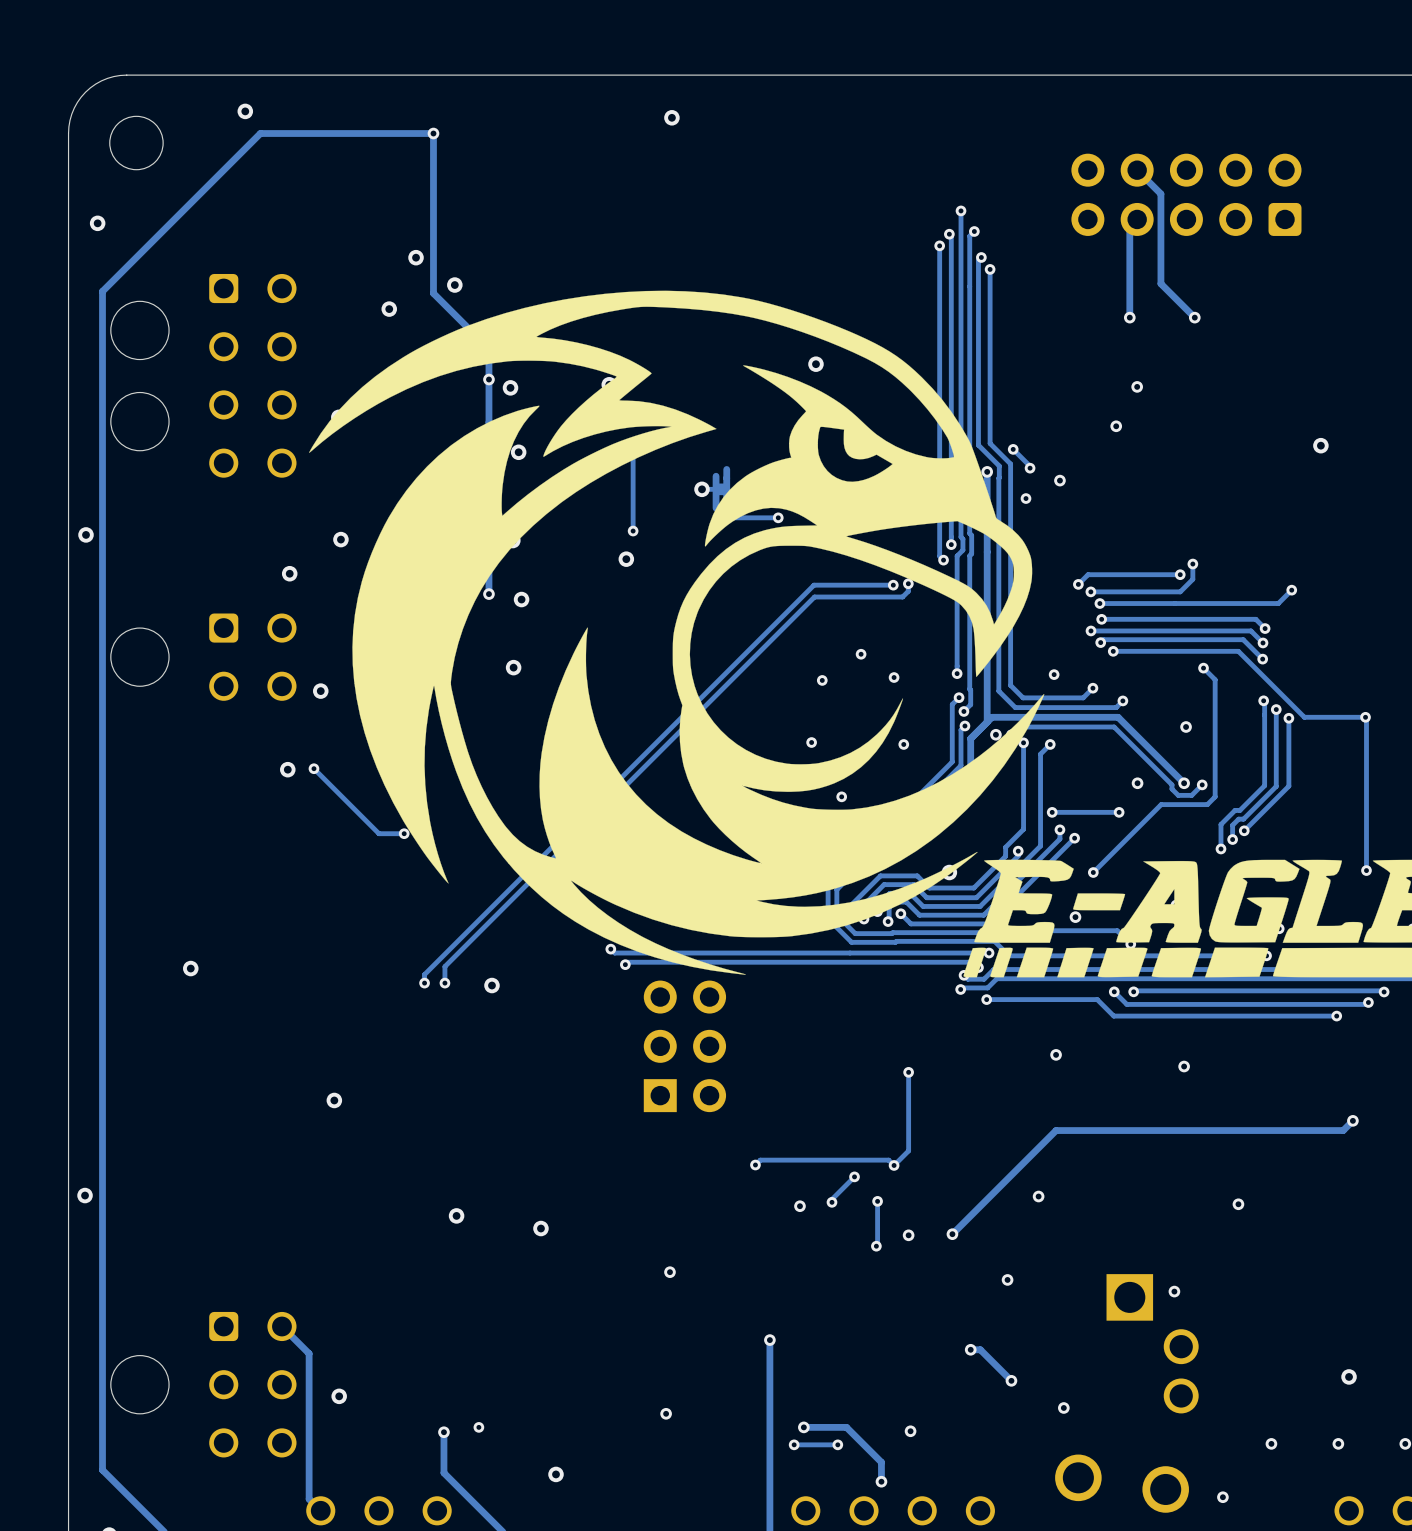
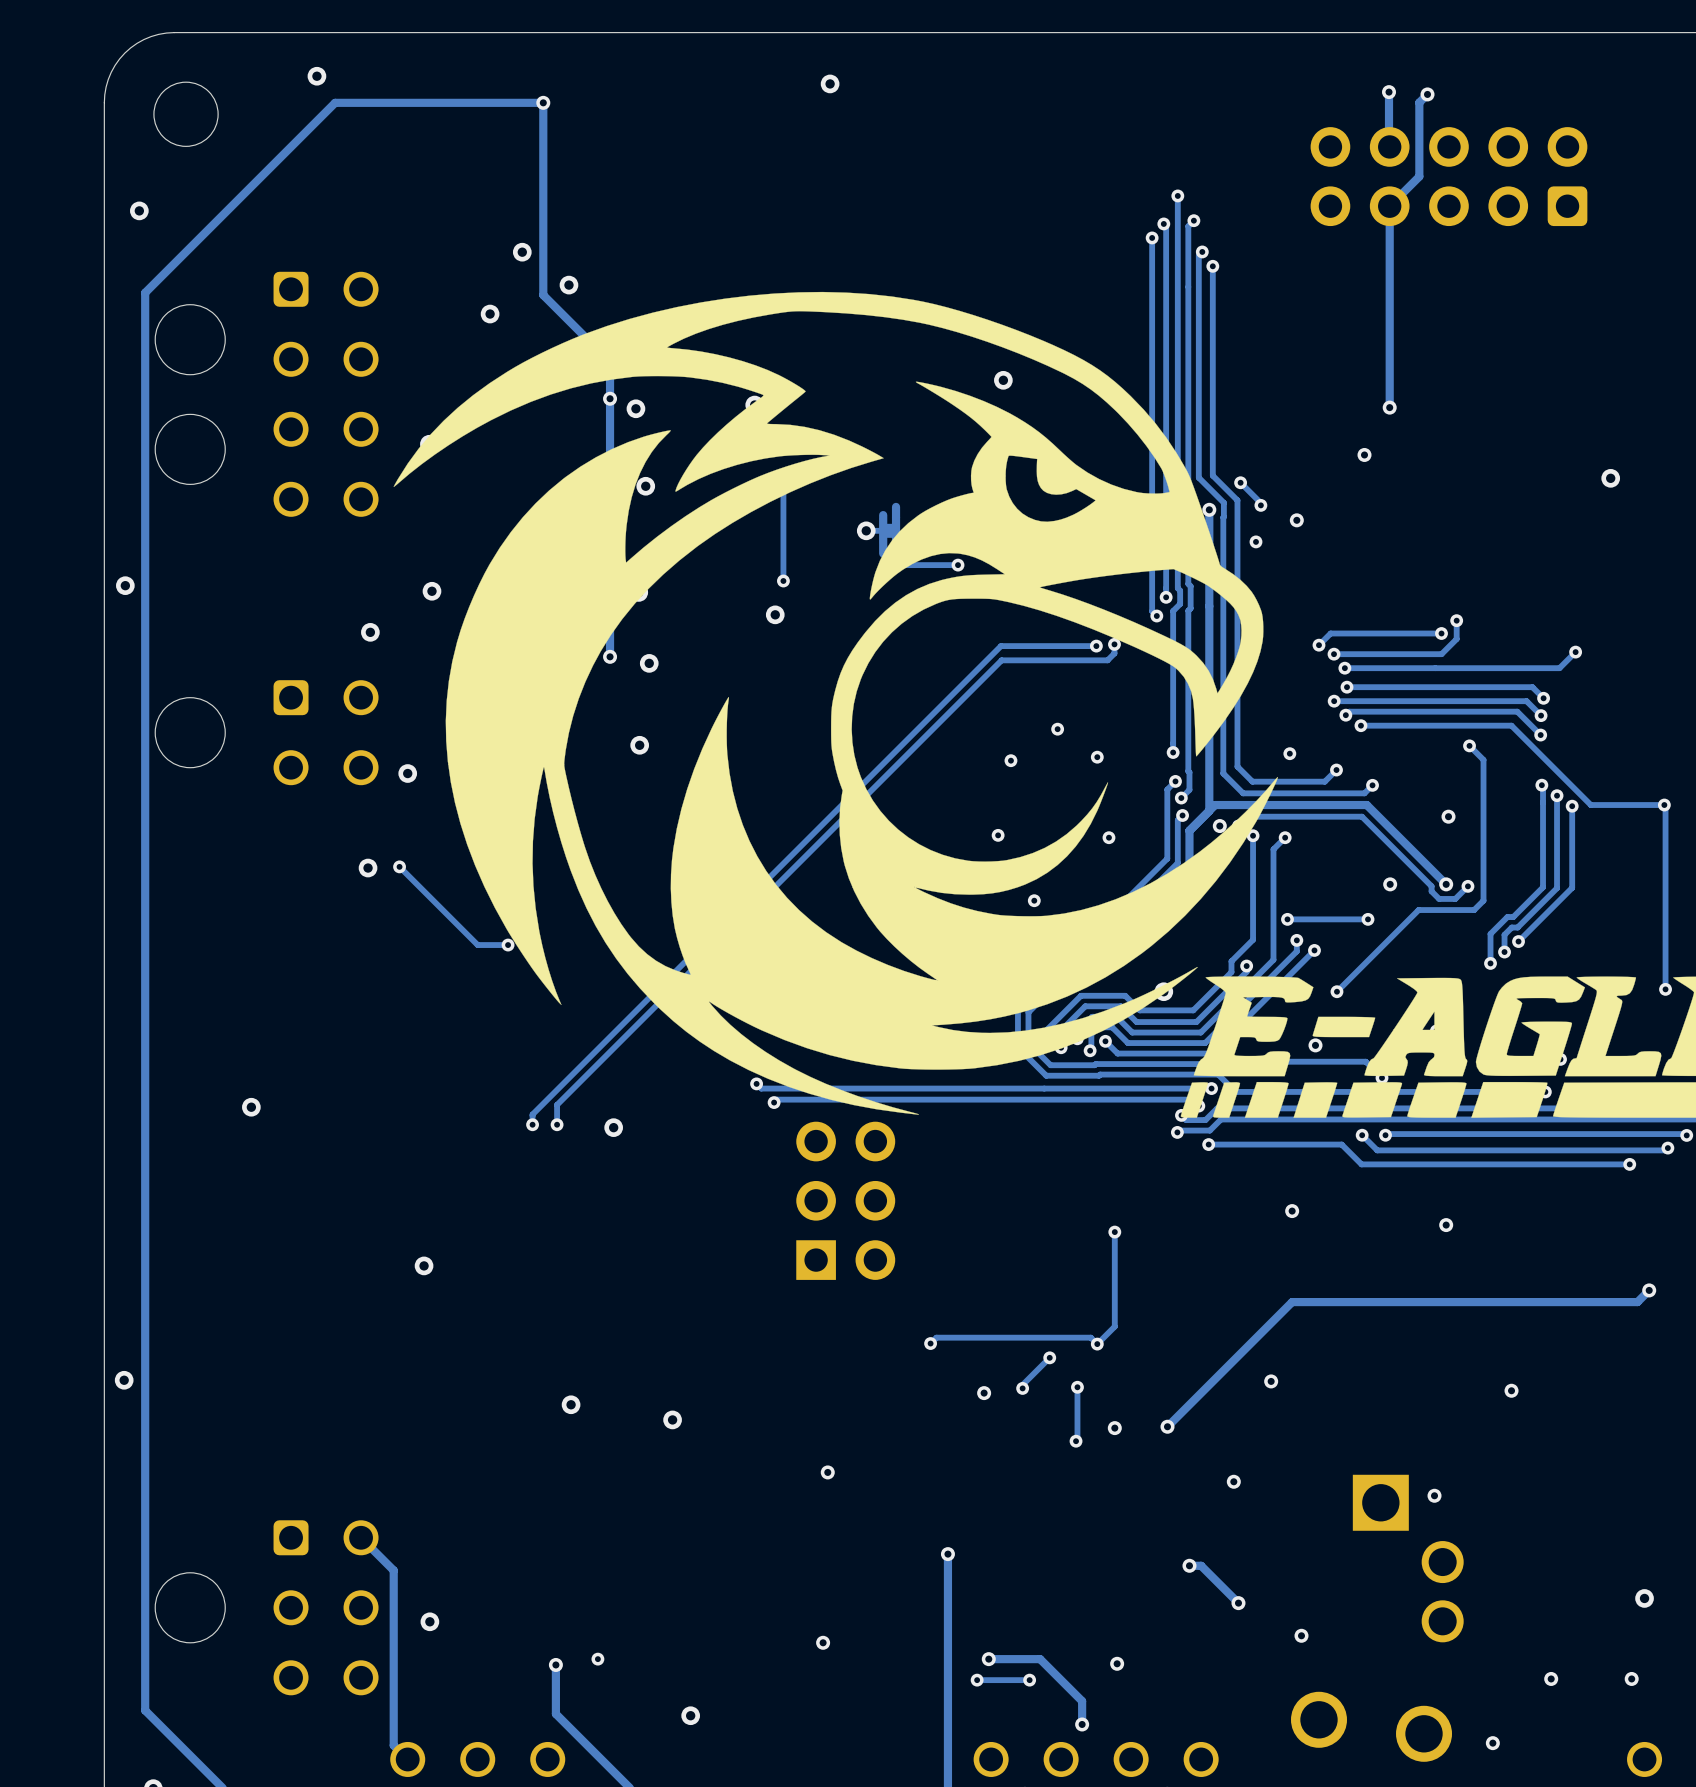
via: none -> (1389, 92)
track: none -> (1427, 94) (1419, 102) (1419, 176) (1389, 206) (1389, 407)
via: none -> (1427, 94)
track: (1137, 170) (1160, 193) (1160, 283) (1194, 317) -> (1389, 146) (1389, 92)
track: (1137, 219) (1129, 226) (1129, 317) -> none
via: (1129, 317) -> none
via: (1194, 317) -> none

